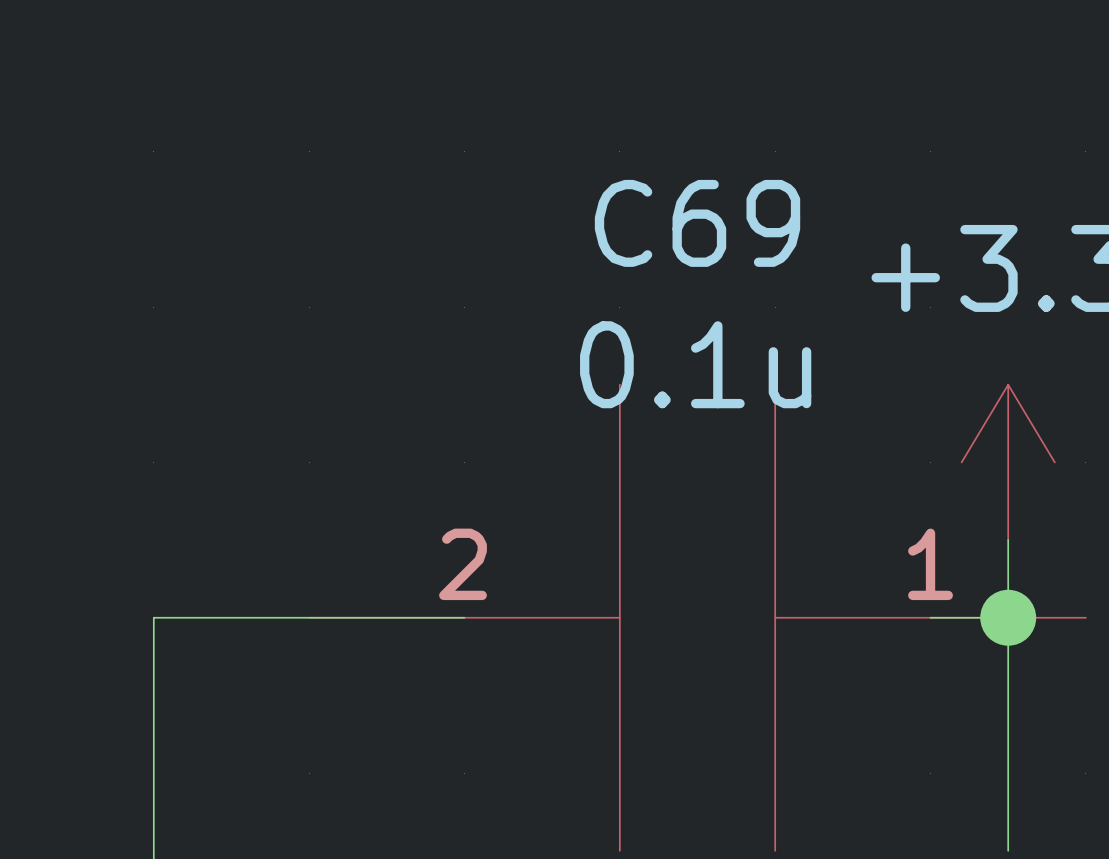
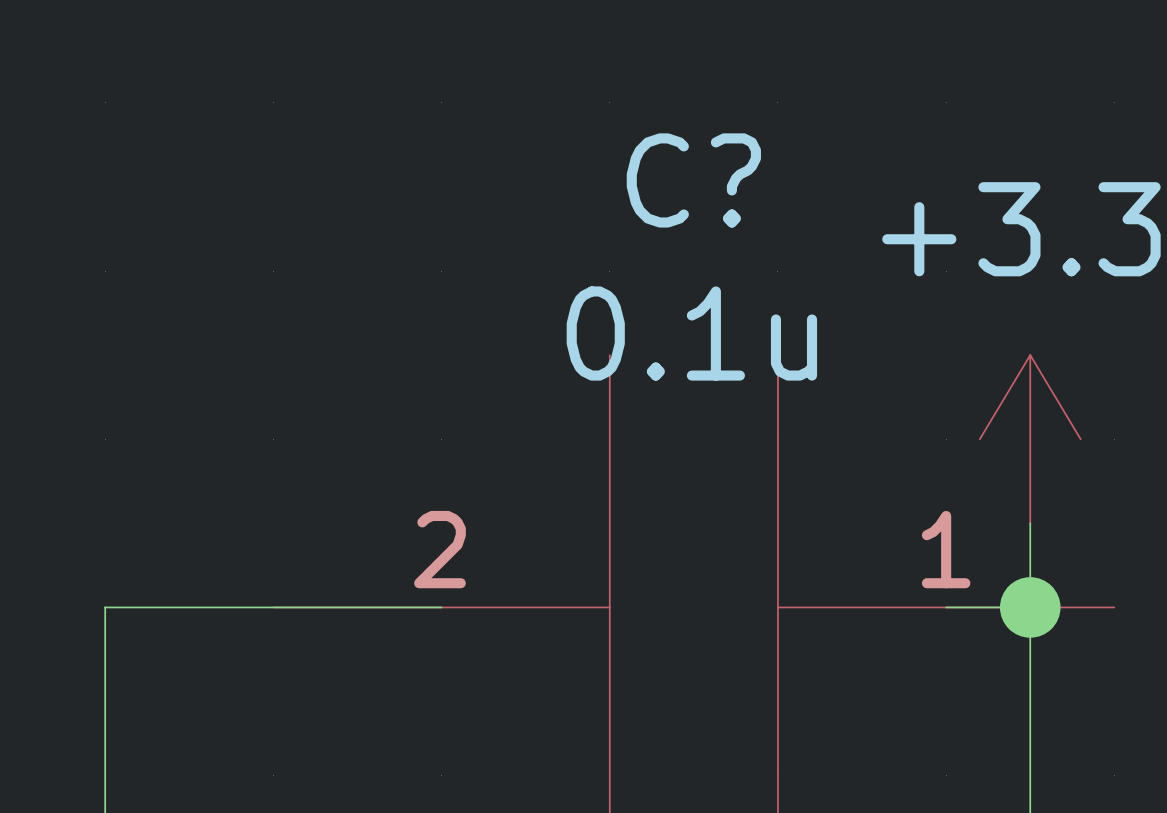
C69 name: C69 (697, 223) -> C? (693, 180)

